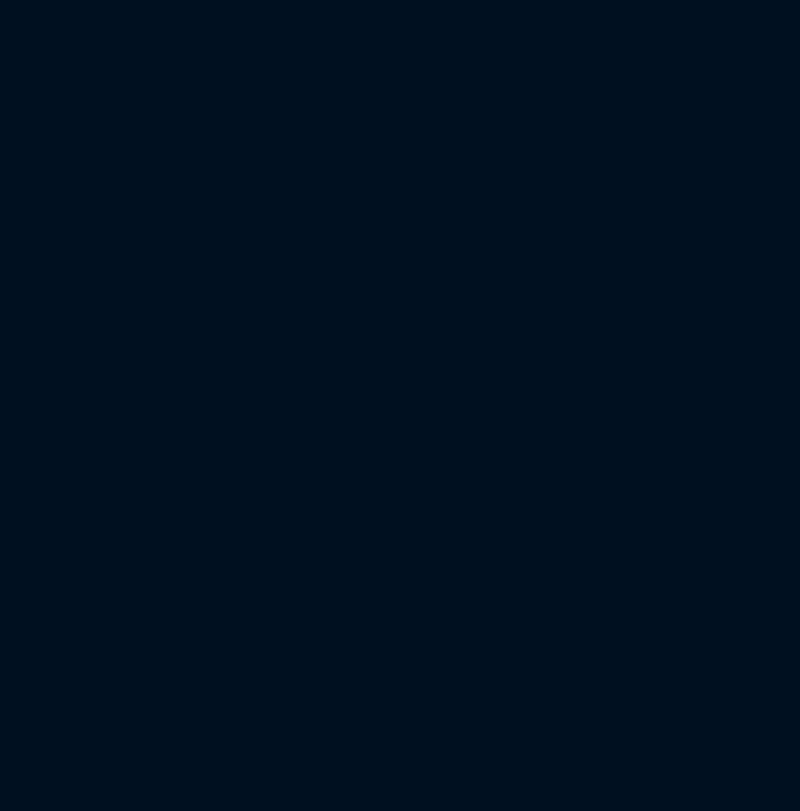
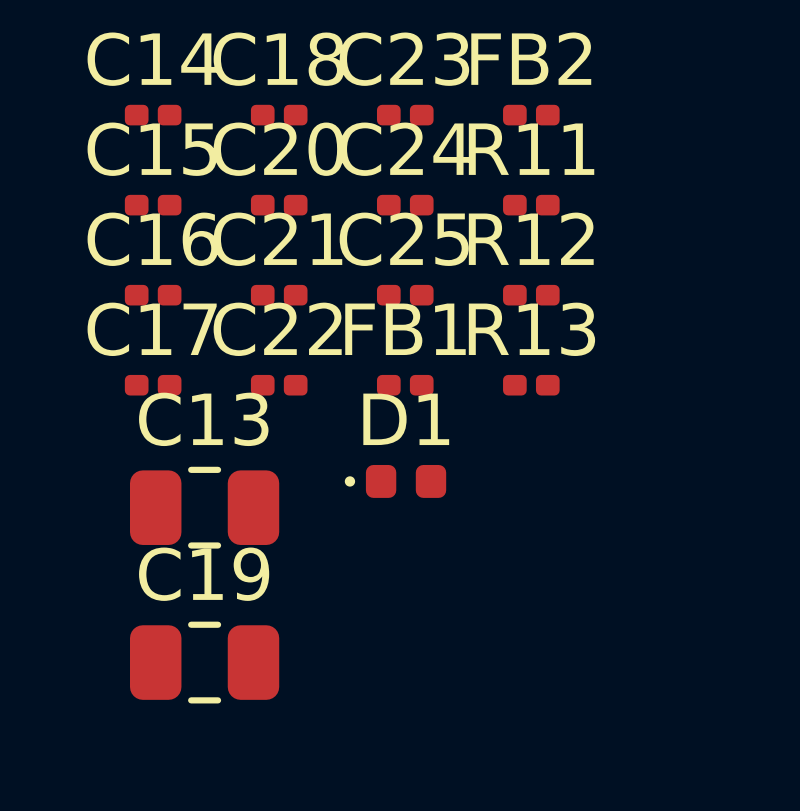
C14: none -> (153, 115)
C18: none -> (279, 115)
C23: none -> (405, 115)
FB2: none -> (531, 115)
C15: none -> (153, 205)
C20: none -> (279, 205)
C24: none -> (405, 205)
R11: none -> (531, 205)
C16: none -> (153, 295)
C21: none -> (279, 295)
C25: none -> (405, 295)
R12: none -> (531, 295)
C17: none -> (153, 385)
C22: none -> (279, 385)
FB1: none -> (405, 385)
R13: none -> (531, 385)
D1: none -> (395, 481)
C13: none -> (204, 507)
C19: none -> (204, 662)

